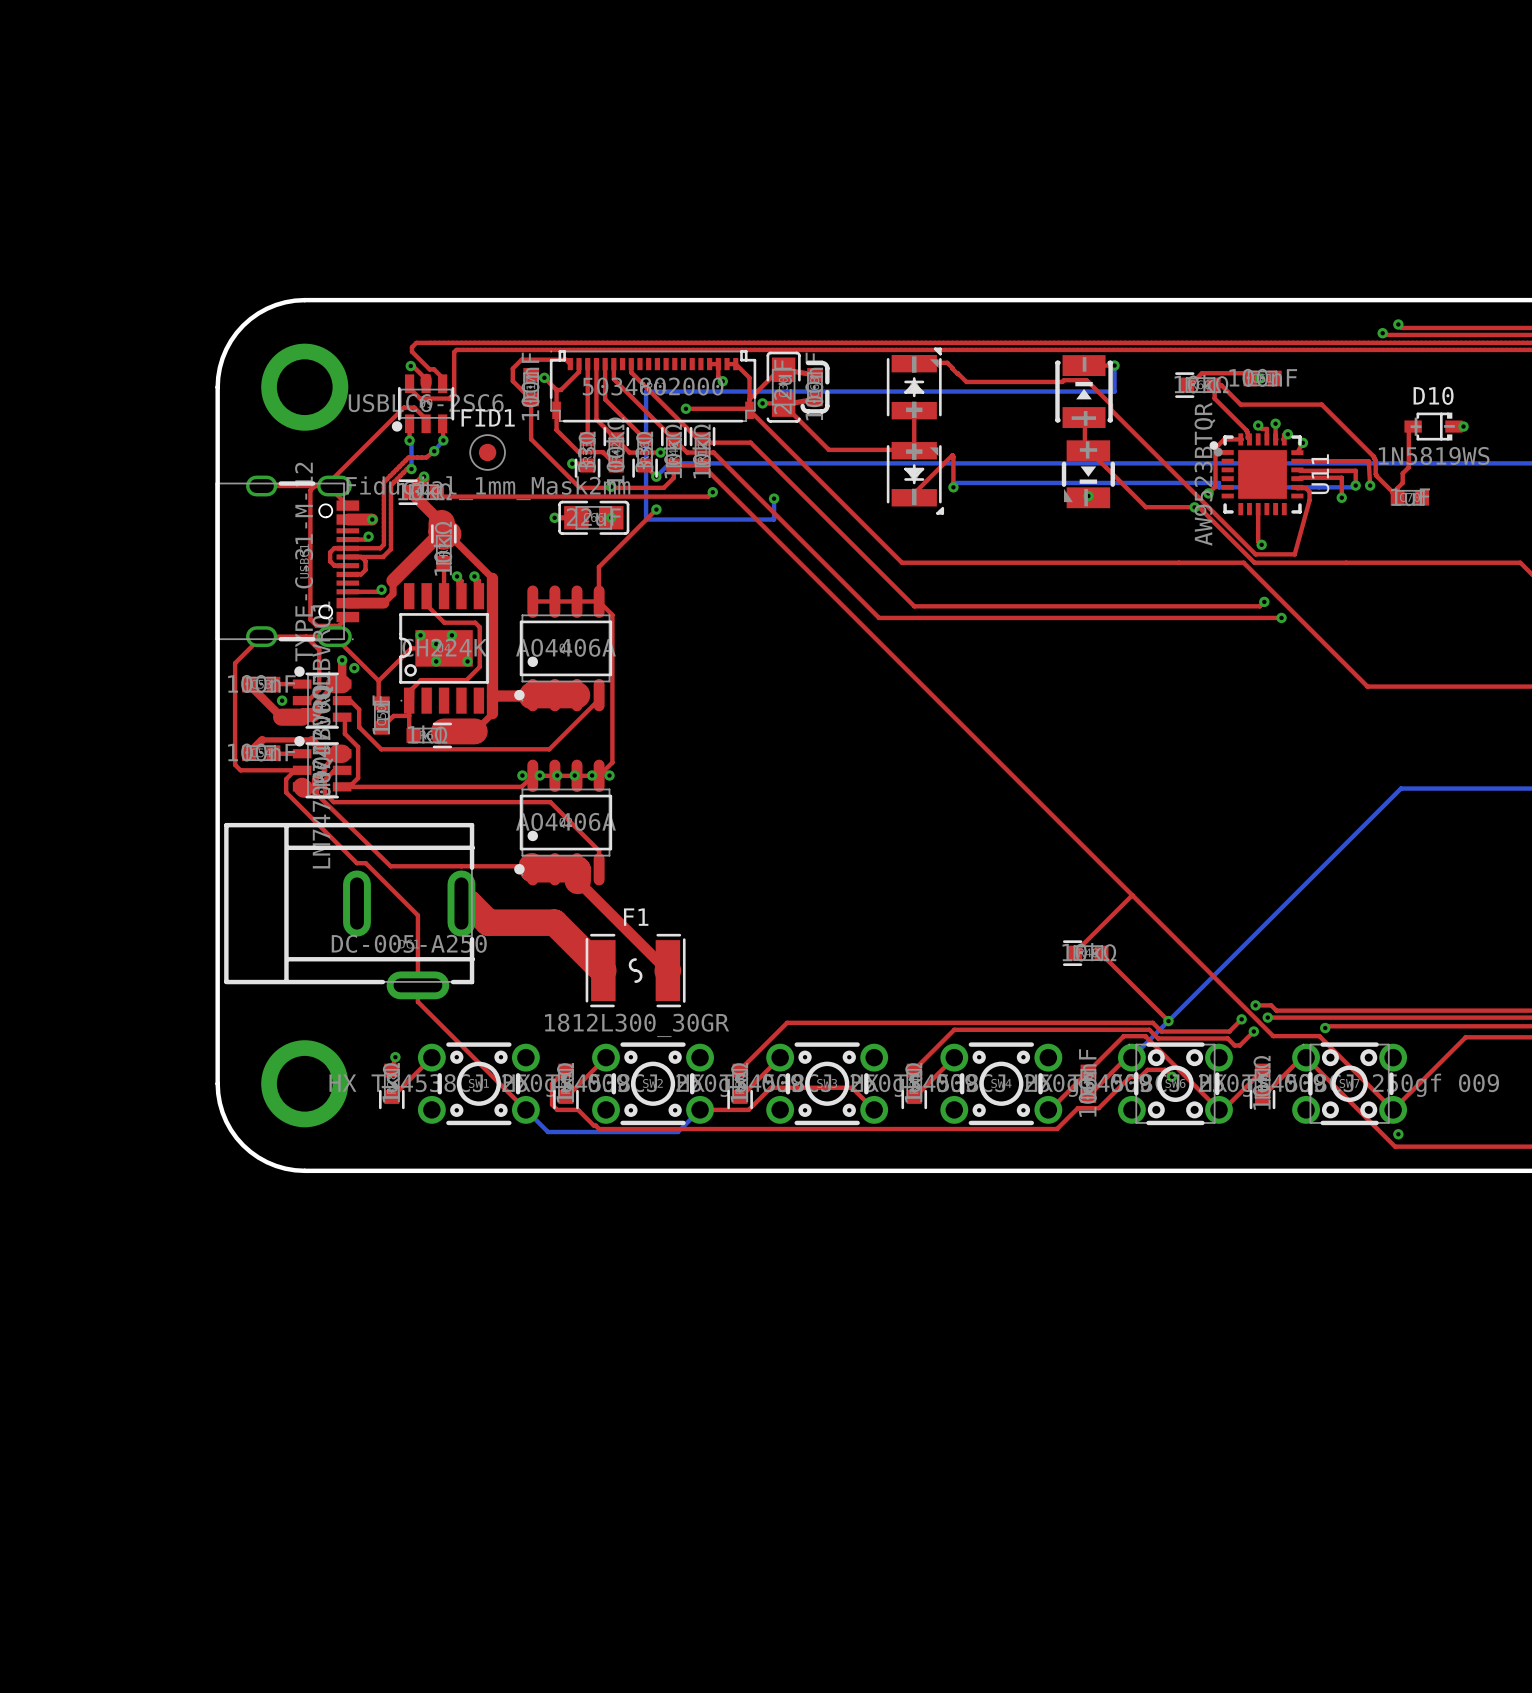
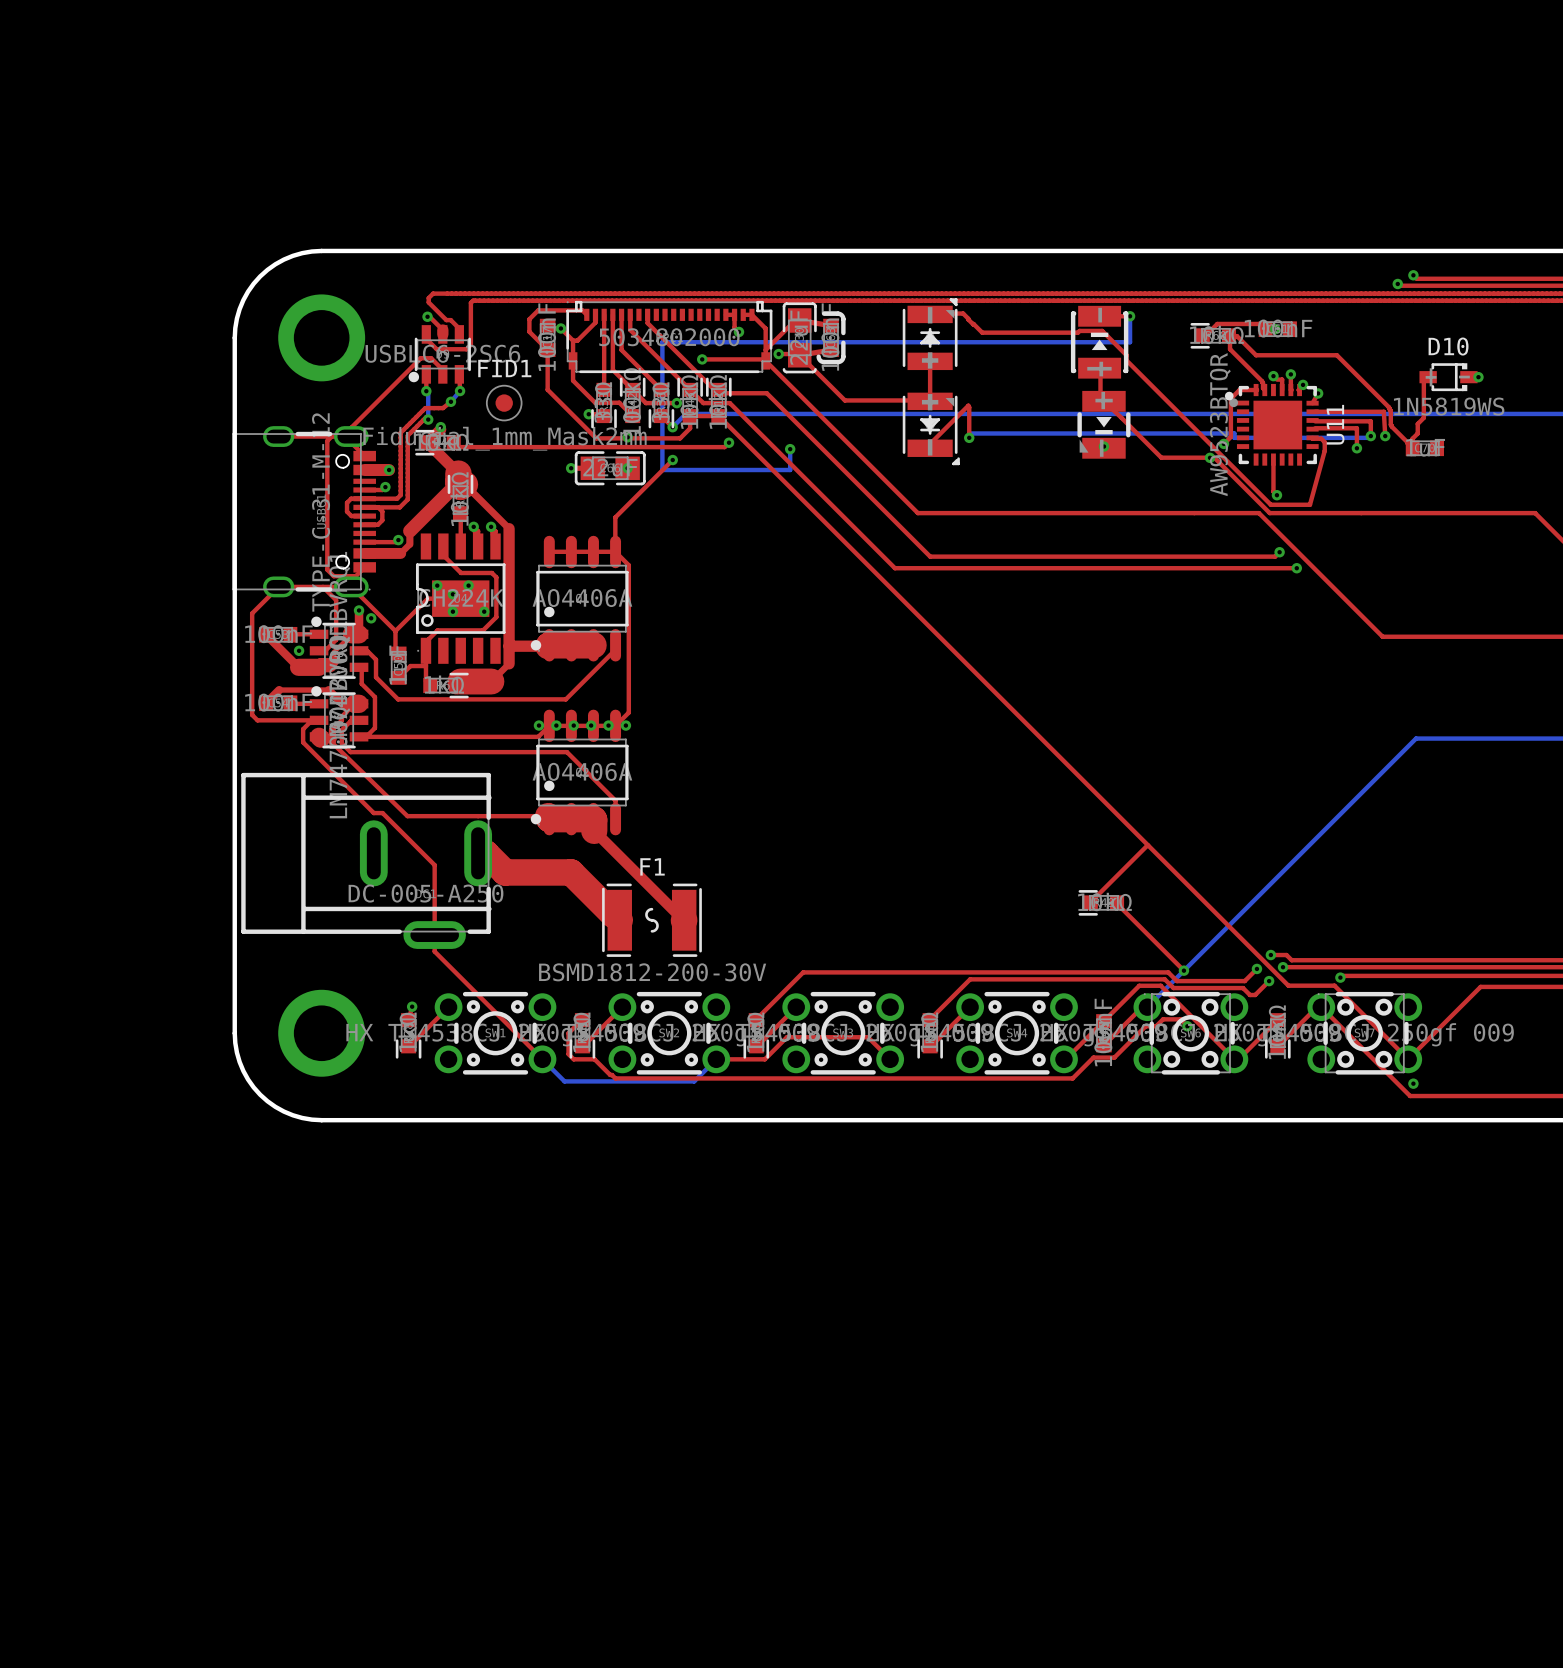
F1 value: 1812L300_30GR (637, 1025) -> BSMD1812-200-30V (652, 972)

